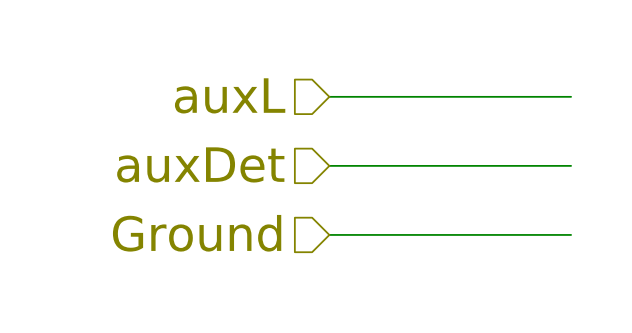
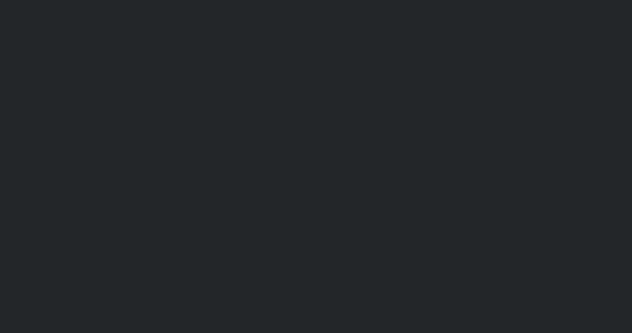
hierarchical label: auxL (230, 95) -> none
wire: (329, 96) (571, 96) -> none
hierarchical label: auxDet (200, 164) -> none
wire: (329, 165) (571, 165) -> none
hierarchical label: Ground (197, 233) -> none
wire: (329, 234) (571, 234) -> none

